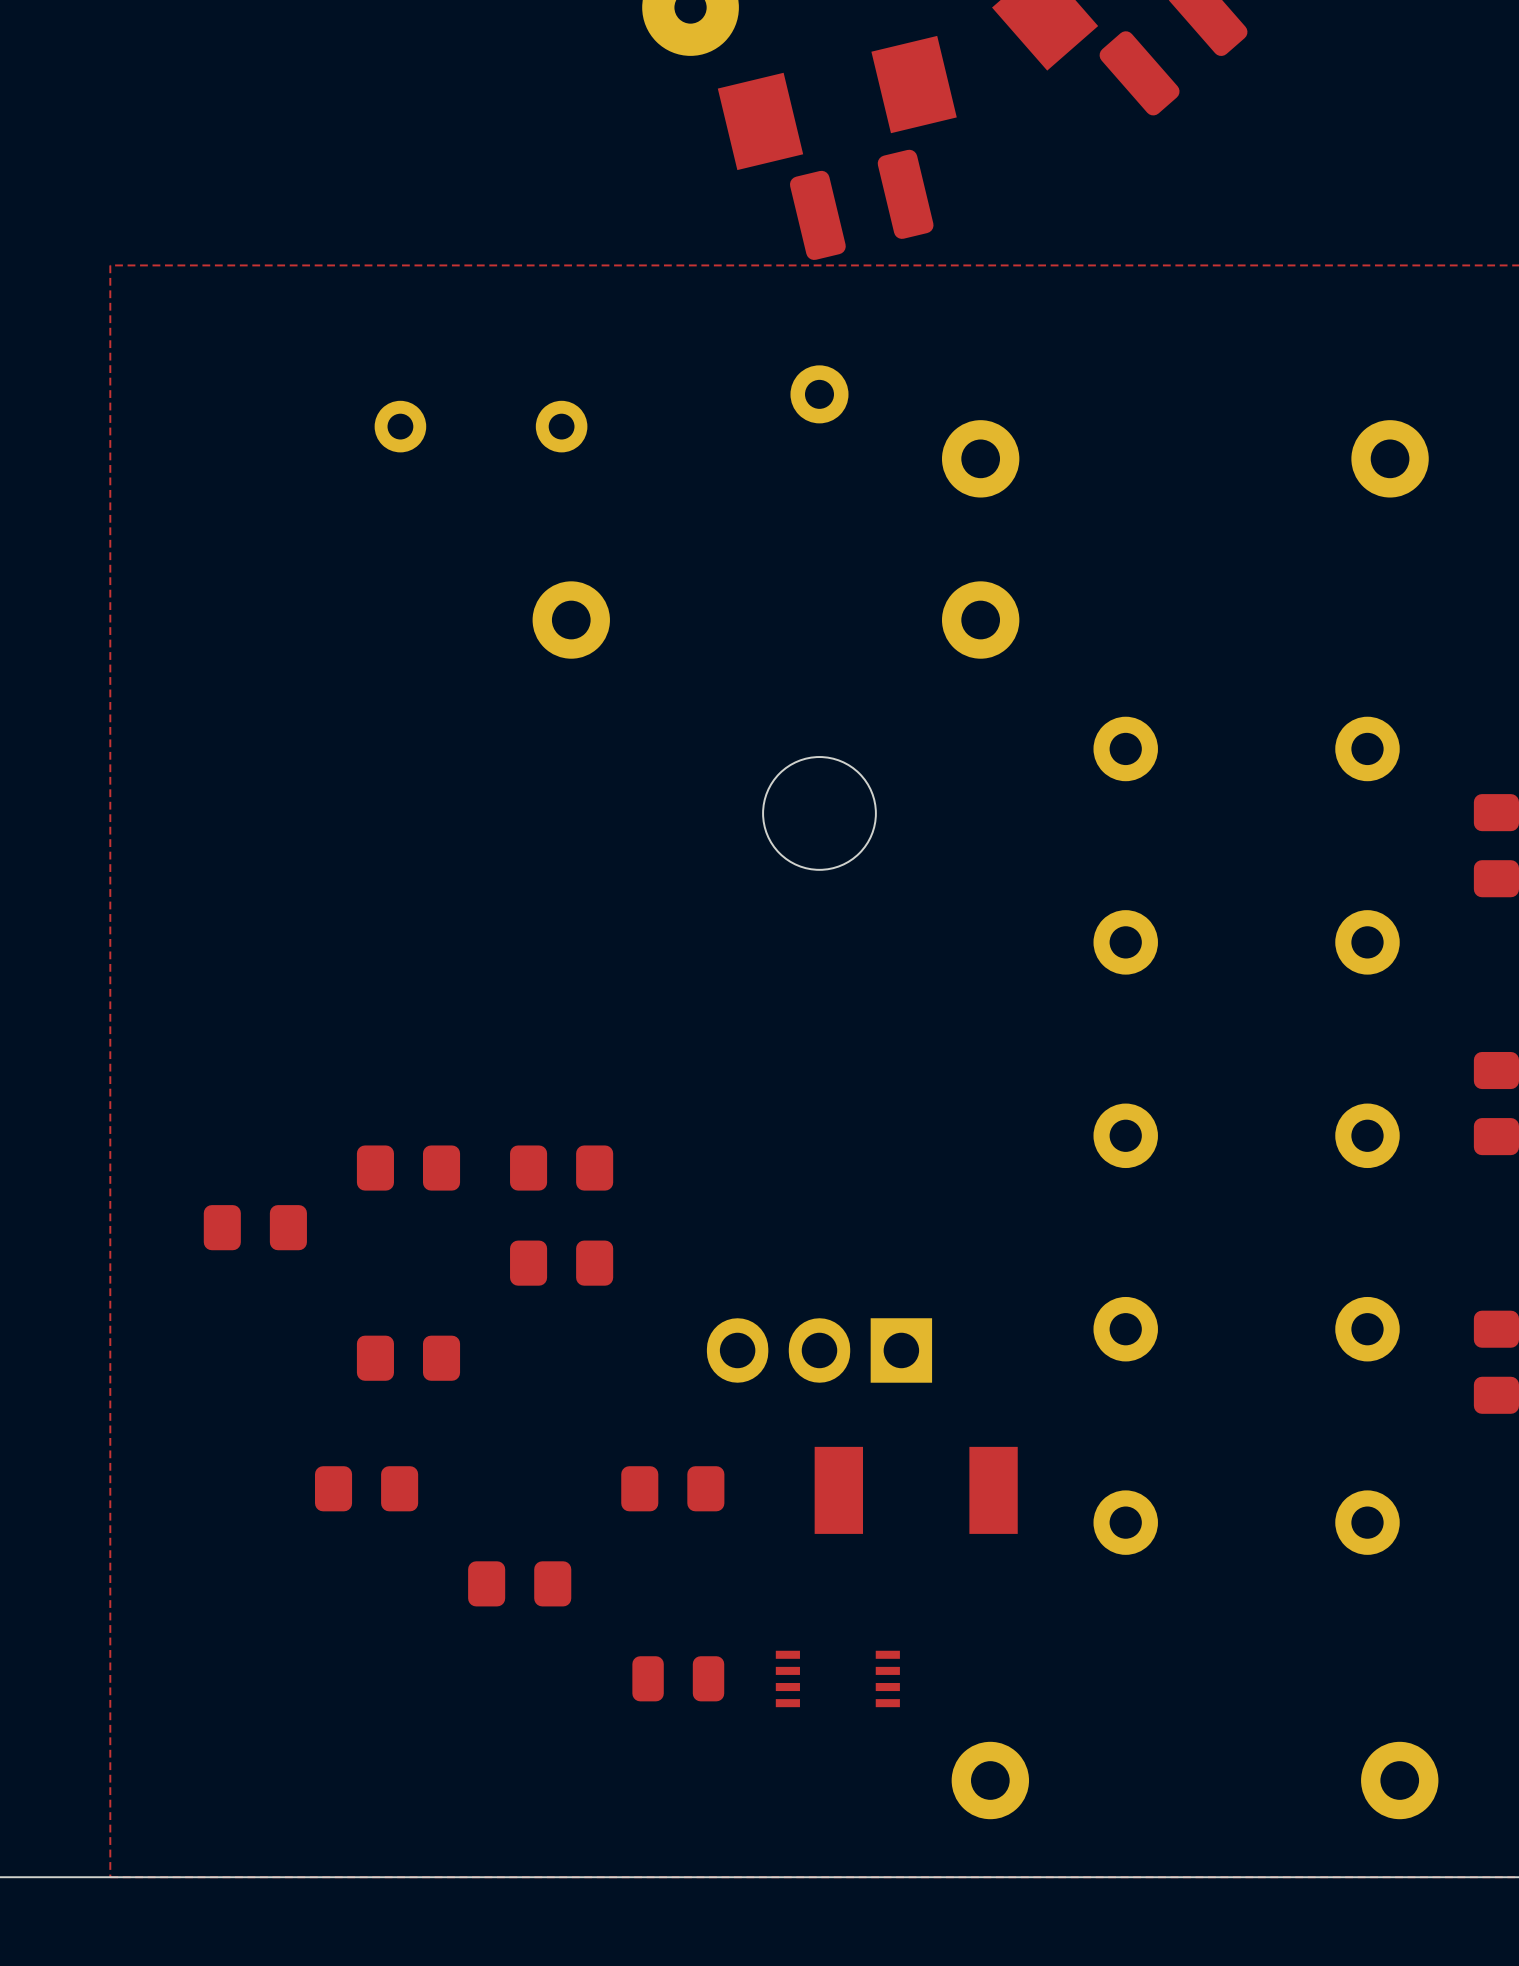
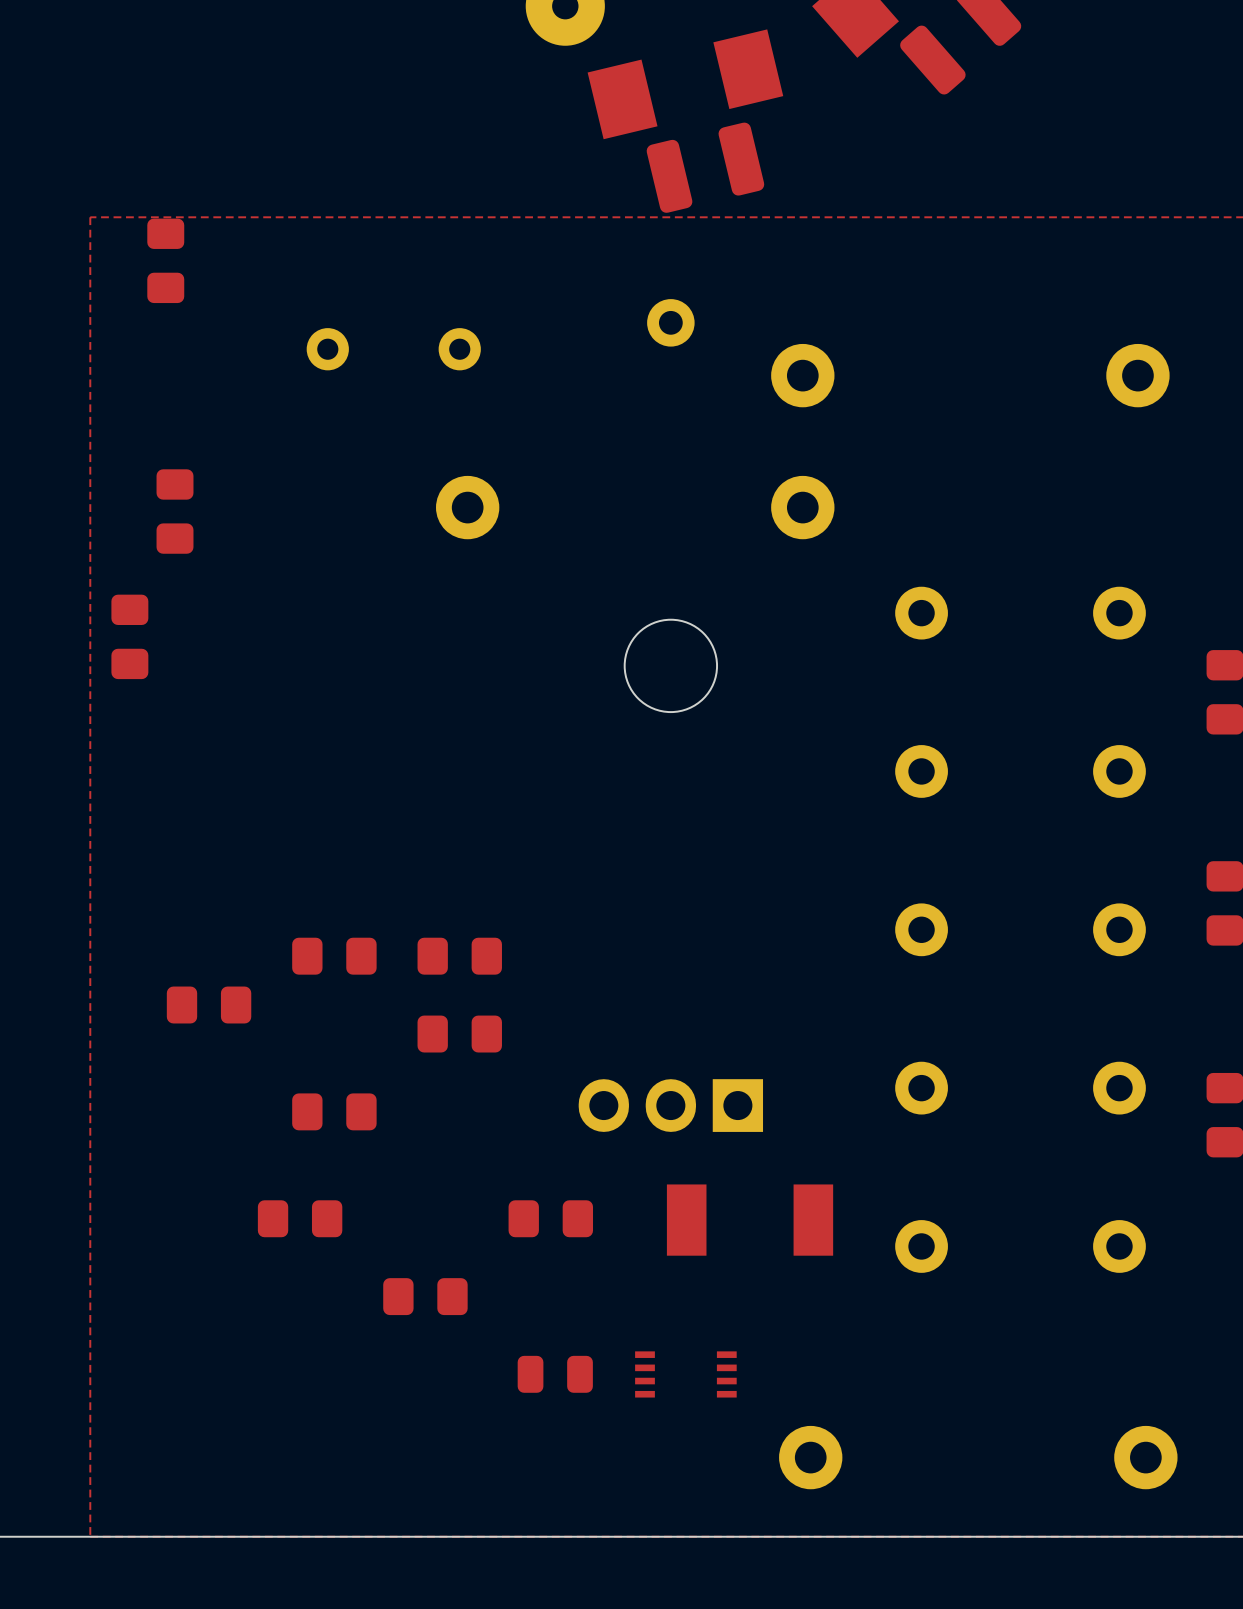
part: none -> (165, 260)
part: none -> (175, 511)
part: none -> (129, 636)

